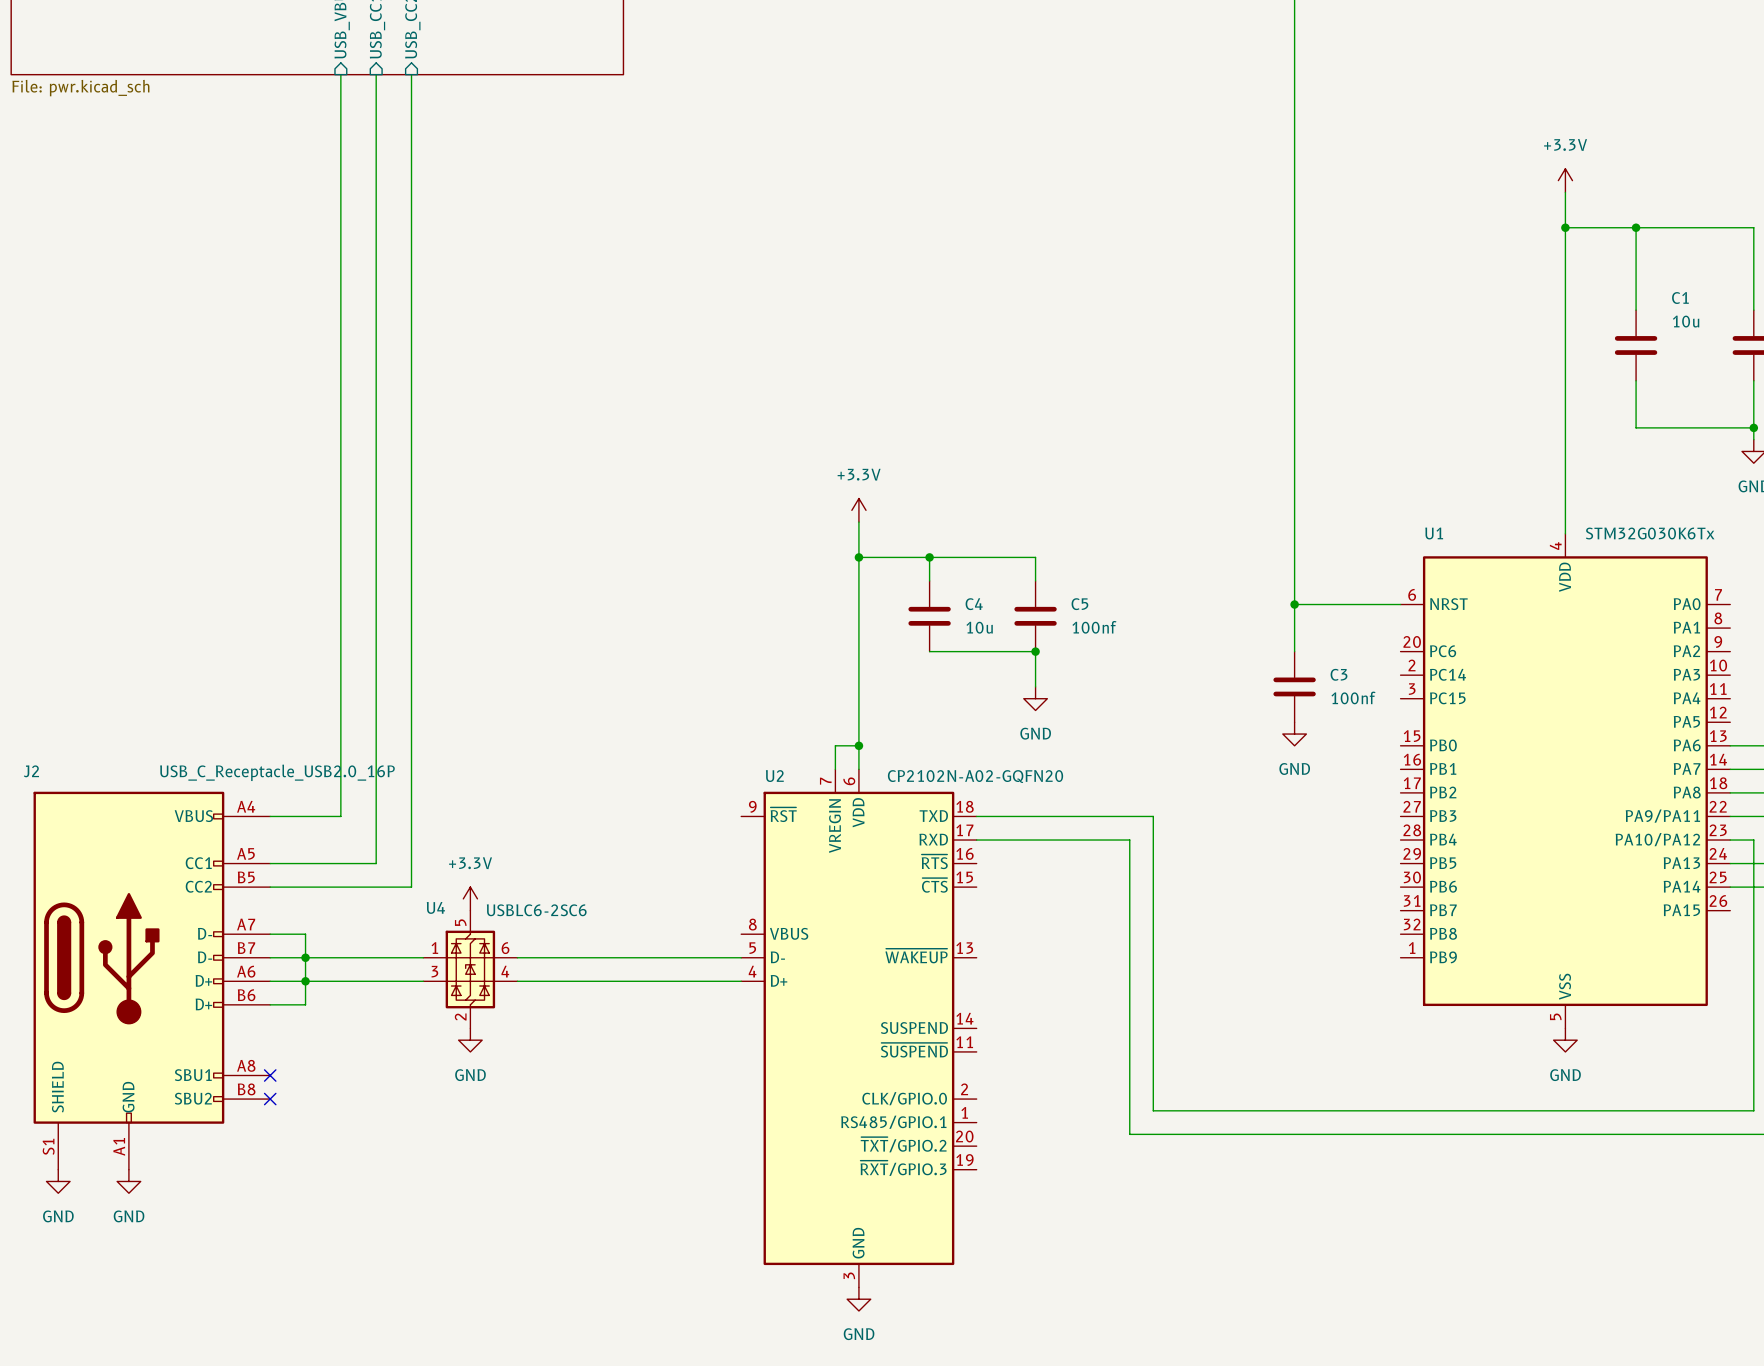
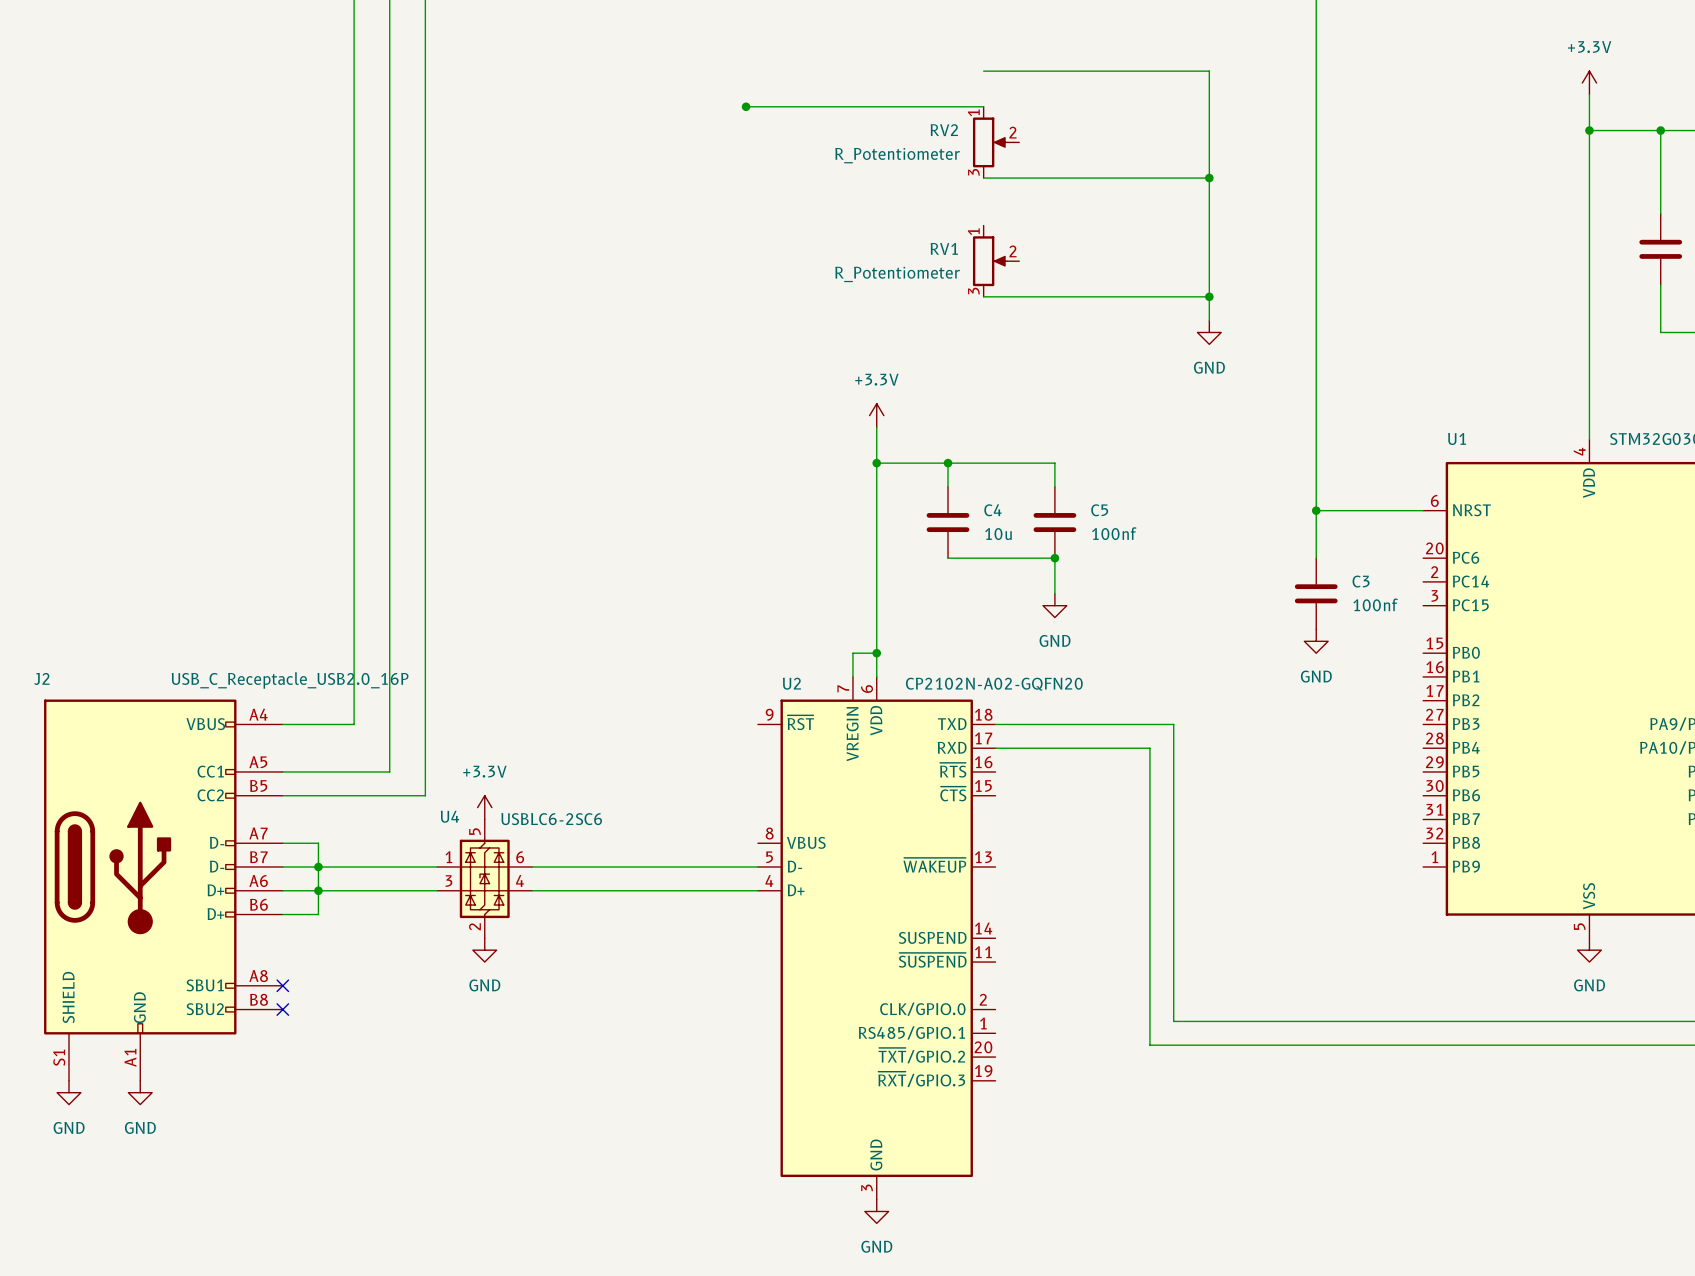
wire: none -> (983, 71) (1209, 71) (1209, 320)
wire: none -> (746, 106) (983, 106)
junction: none -> (746, 106)
RV2: none -> R_Potentiometer (996, 142)
wire: none -> (983, 178) (1209, 178)
junction: none -> (1209, 178)
RV1: none -> R_Potentiometer (996, 261)
wire: none -> (983, 296) (1209, 296)
junction: none -> (1209, 296)
power symbol: none -> GND (1209, 332)

